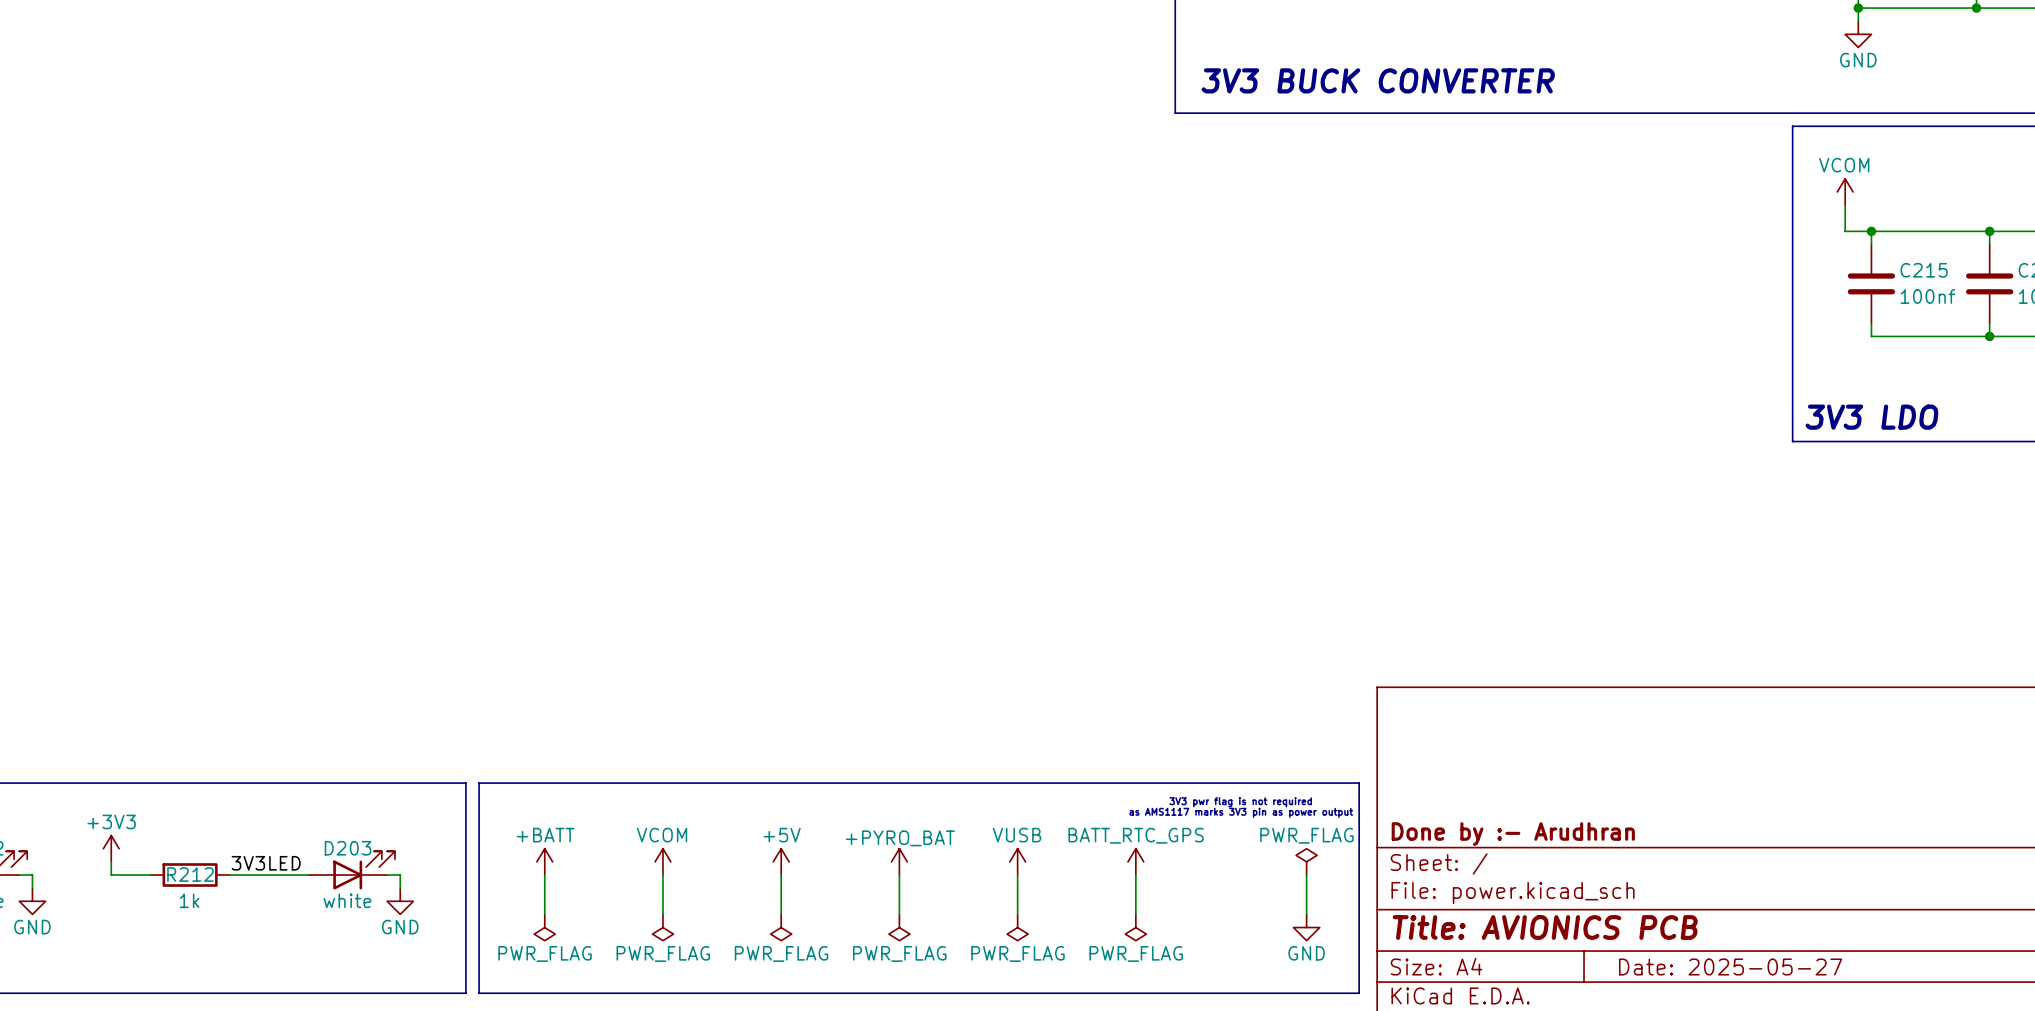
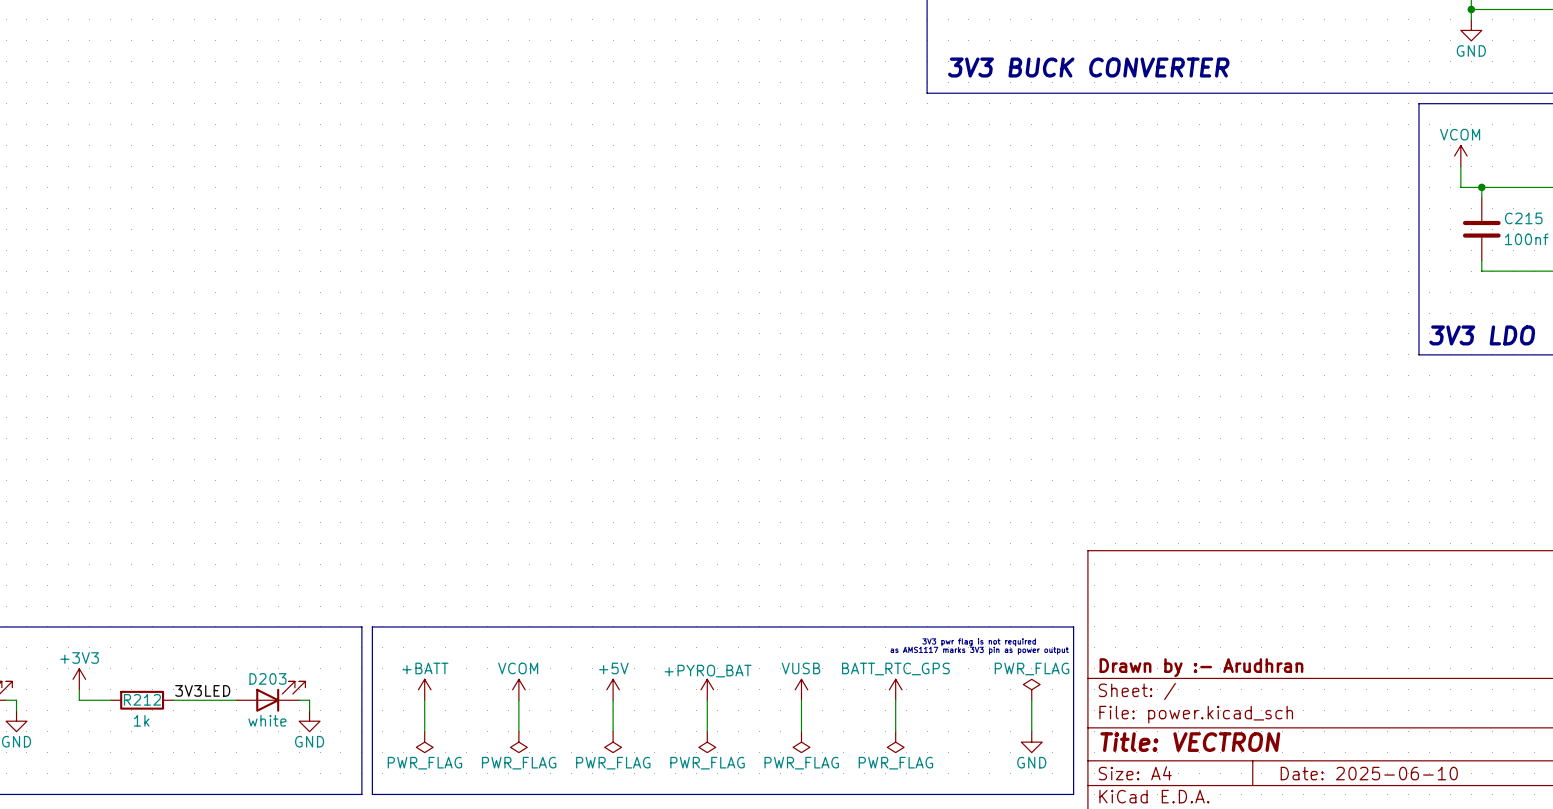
title block: Done by :- Arudhran (1513, 834) -> Drawn by :- Arudhran (1201, 667)
title block: Title: AVIONICS PCB (1545, 927) -> Title: VECTRON (1190, 742)
title block: Date: 2025-05-27 (1730, 967) -> Date: 2025-06-10 (1369, 773)

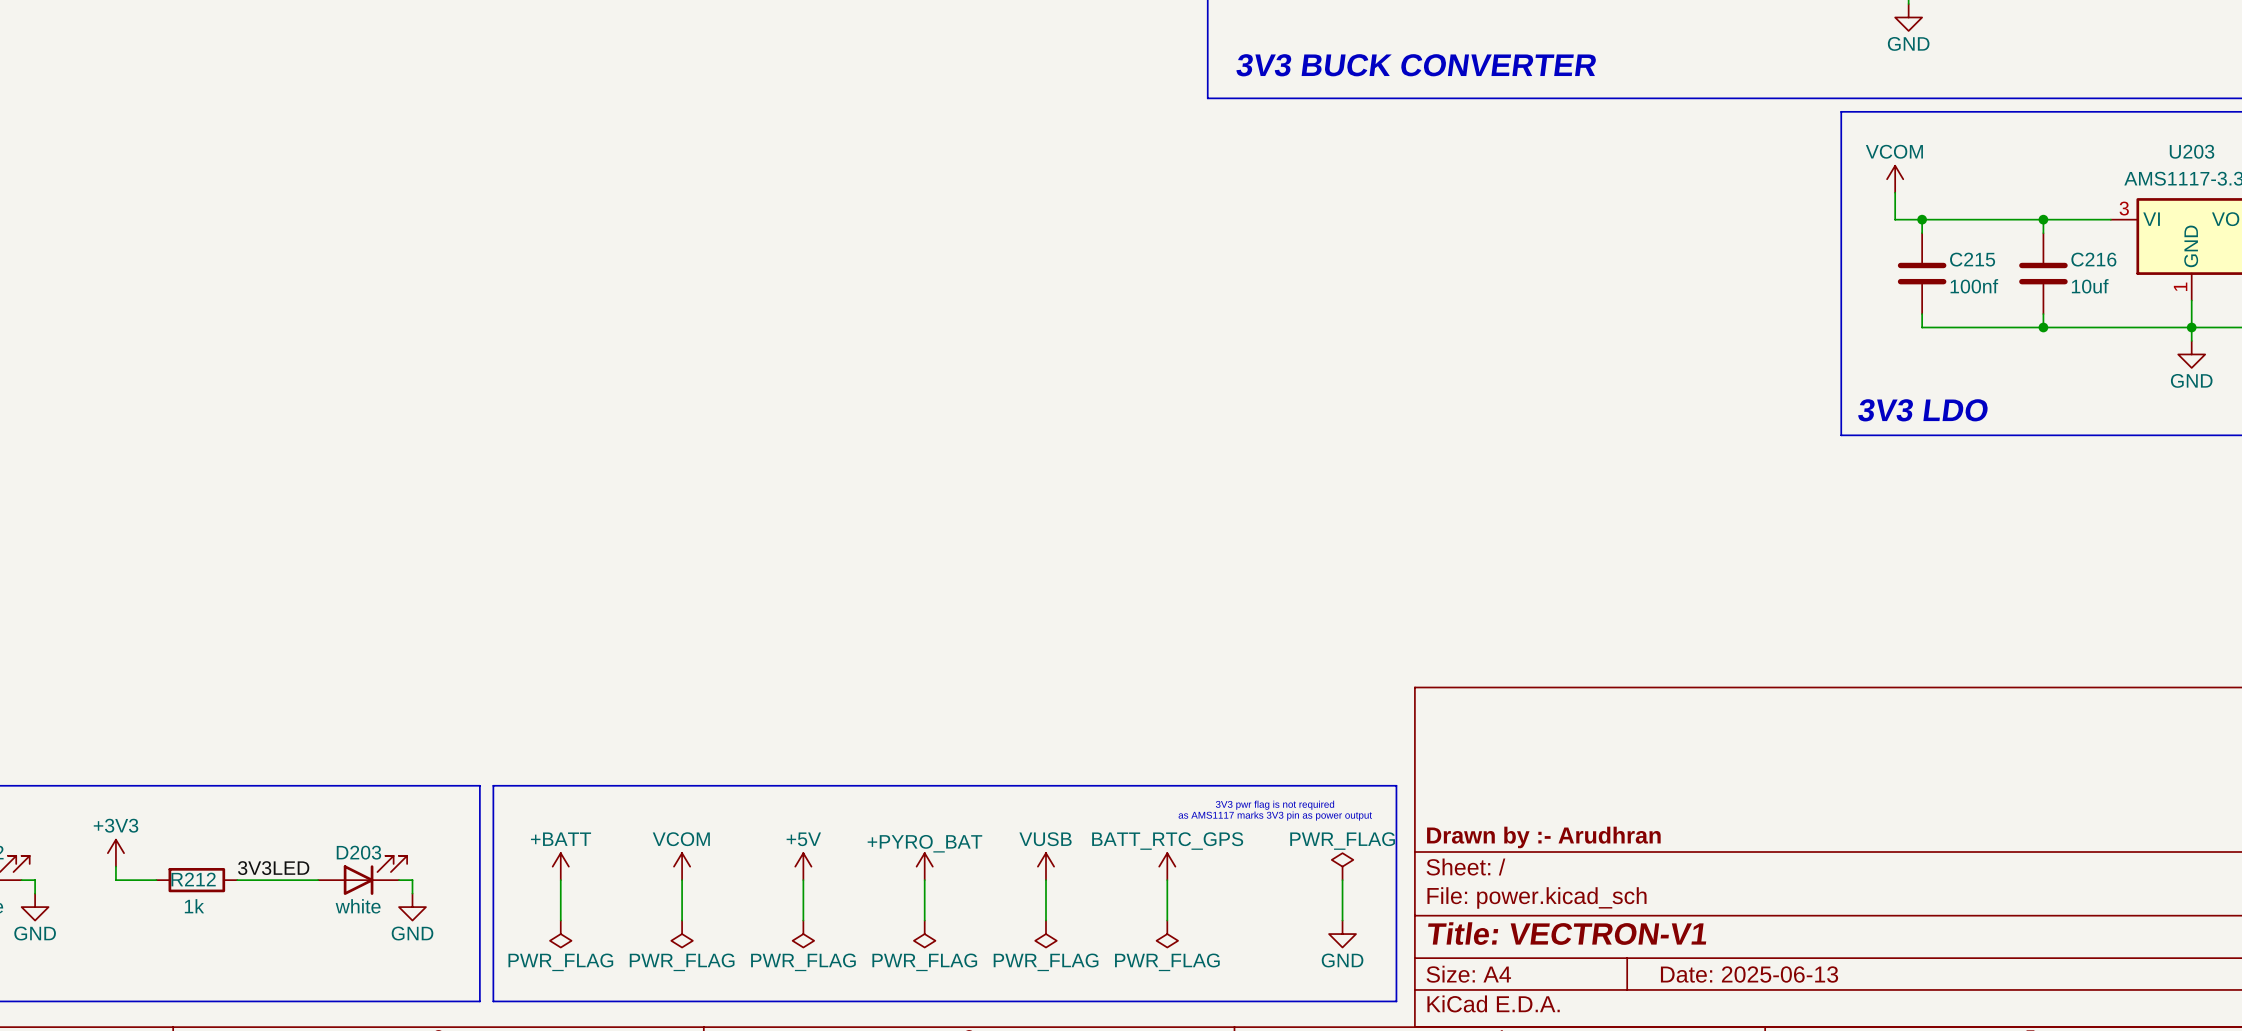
title block: Title: VECTRON (1190, 742) -> Title: VECTRON-V1 (1567, 933)
title block: Date: 2025-06-10 (1369, 773) -> Date: 2025-06-13 (1749, 974)

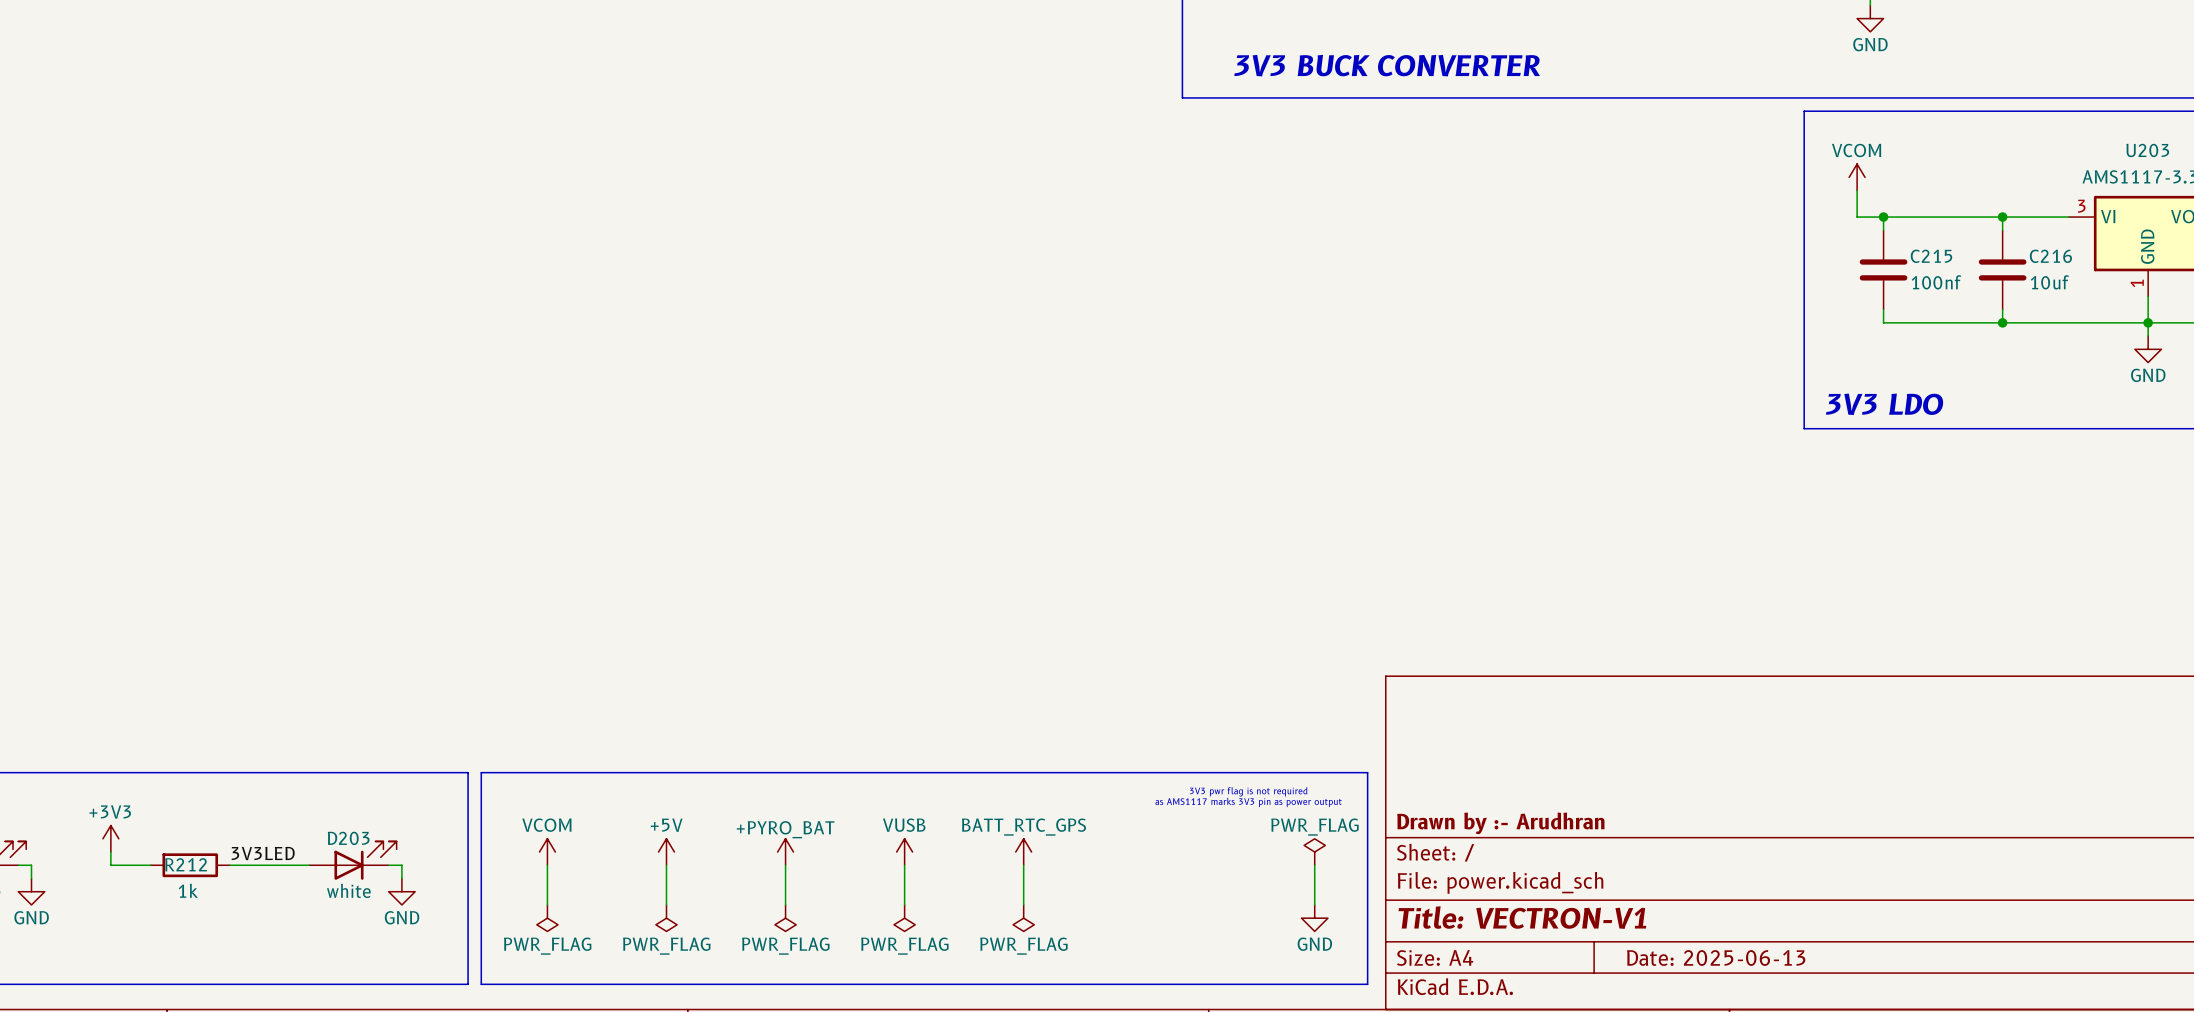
power symbol: +BATT (560, 866) -> VCOM (547, 852)
power symbol: VCOM (682, 866) -> +5V (666, 852)
power symbol: +5V (803, 866) -> +PYRO_BAT (785, 852)
power symbol: +PYRO_BAT (924, 866) -> VUSB (904, 852)
power symbol: VUSB (1046, 866) -> BATT_RTC_GPS (1023, 852)
power symbol: BATT_RTC_GPS (1167, 866) -> none
wire: (1167, 880) (1167, 920) -> none
power symbol: PWR_FLAG (1167, 934) -> none

